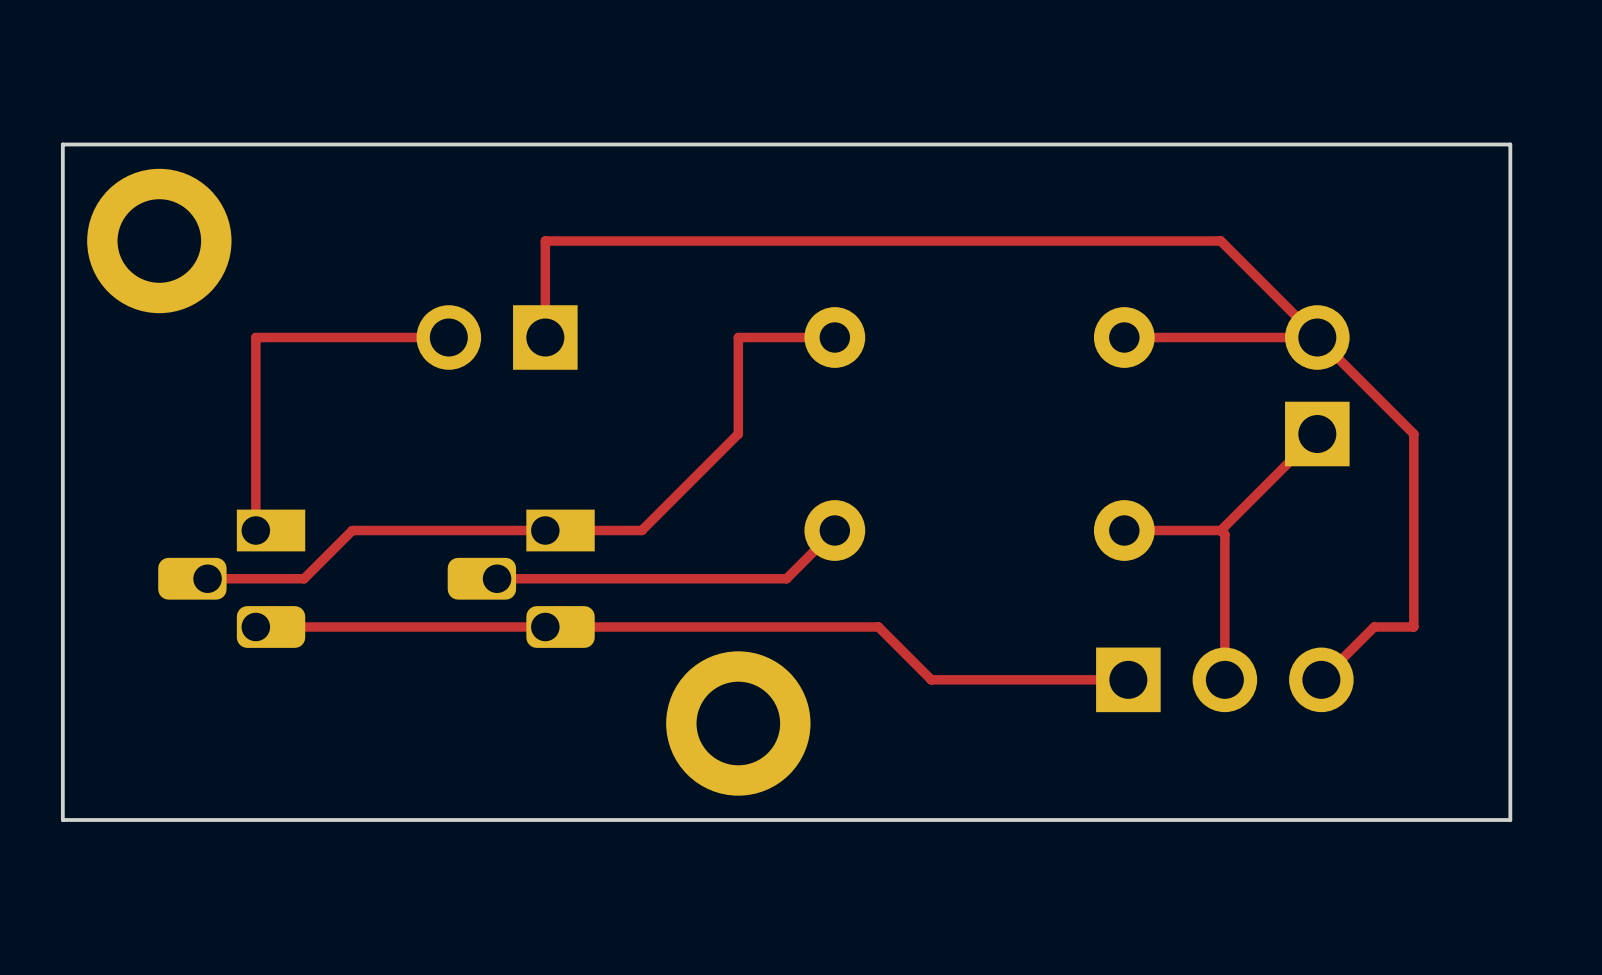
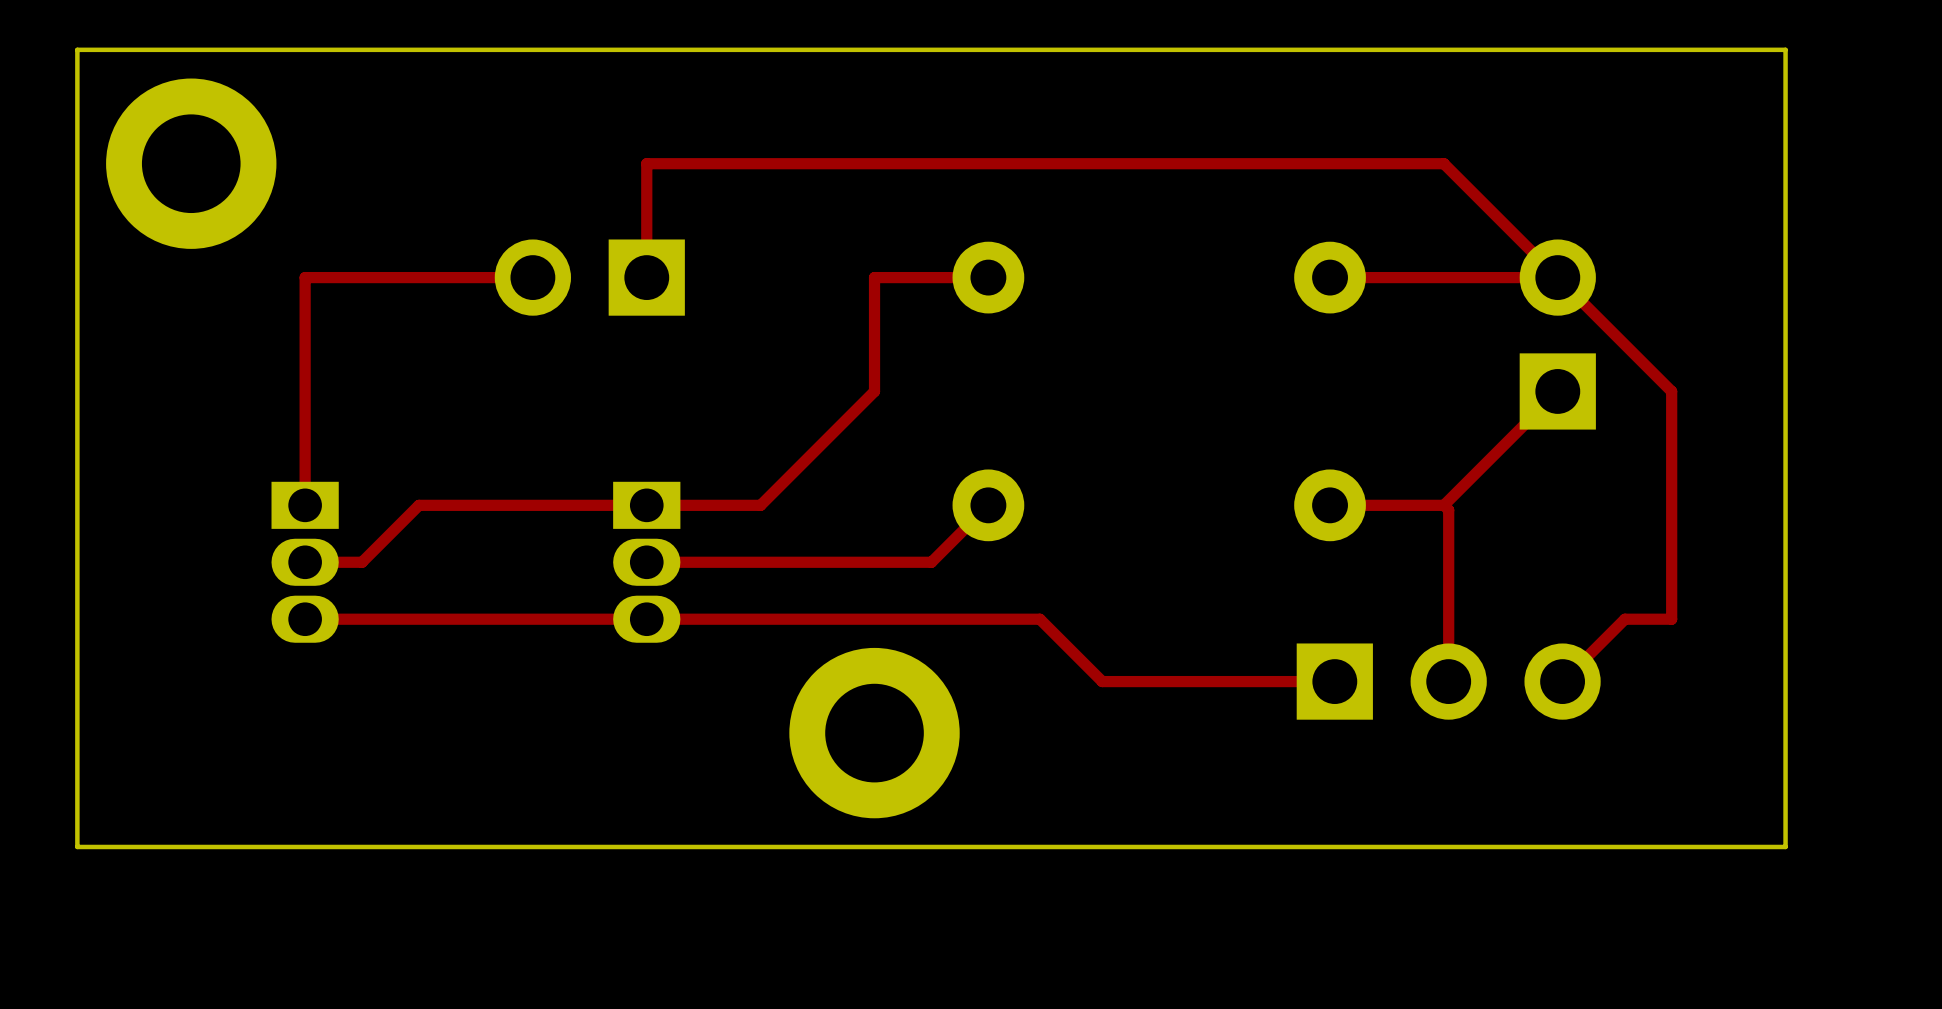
part footprint: [158, 509, 306, 648] -> [271, 481, 339, 643]
part footprint: [447, 509, 595, 648] -> [613, 481, 681, 643]
top track: (255, 578) (207, 578) -> none
top track: (545, 578) (497, 578) -> none

